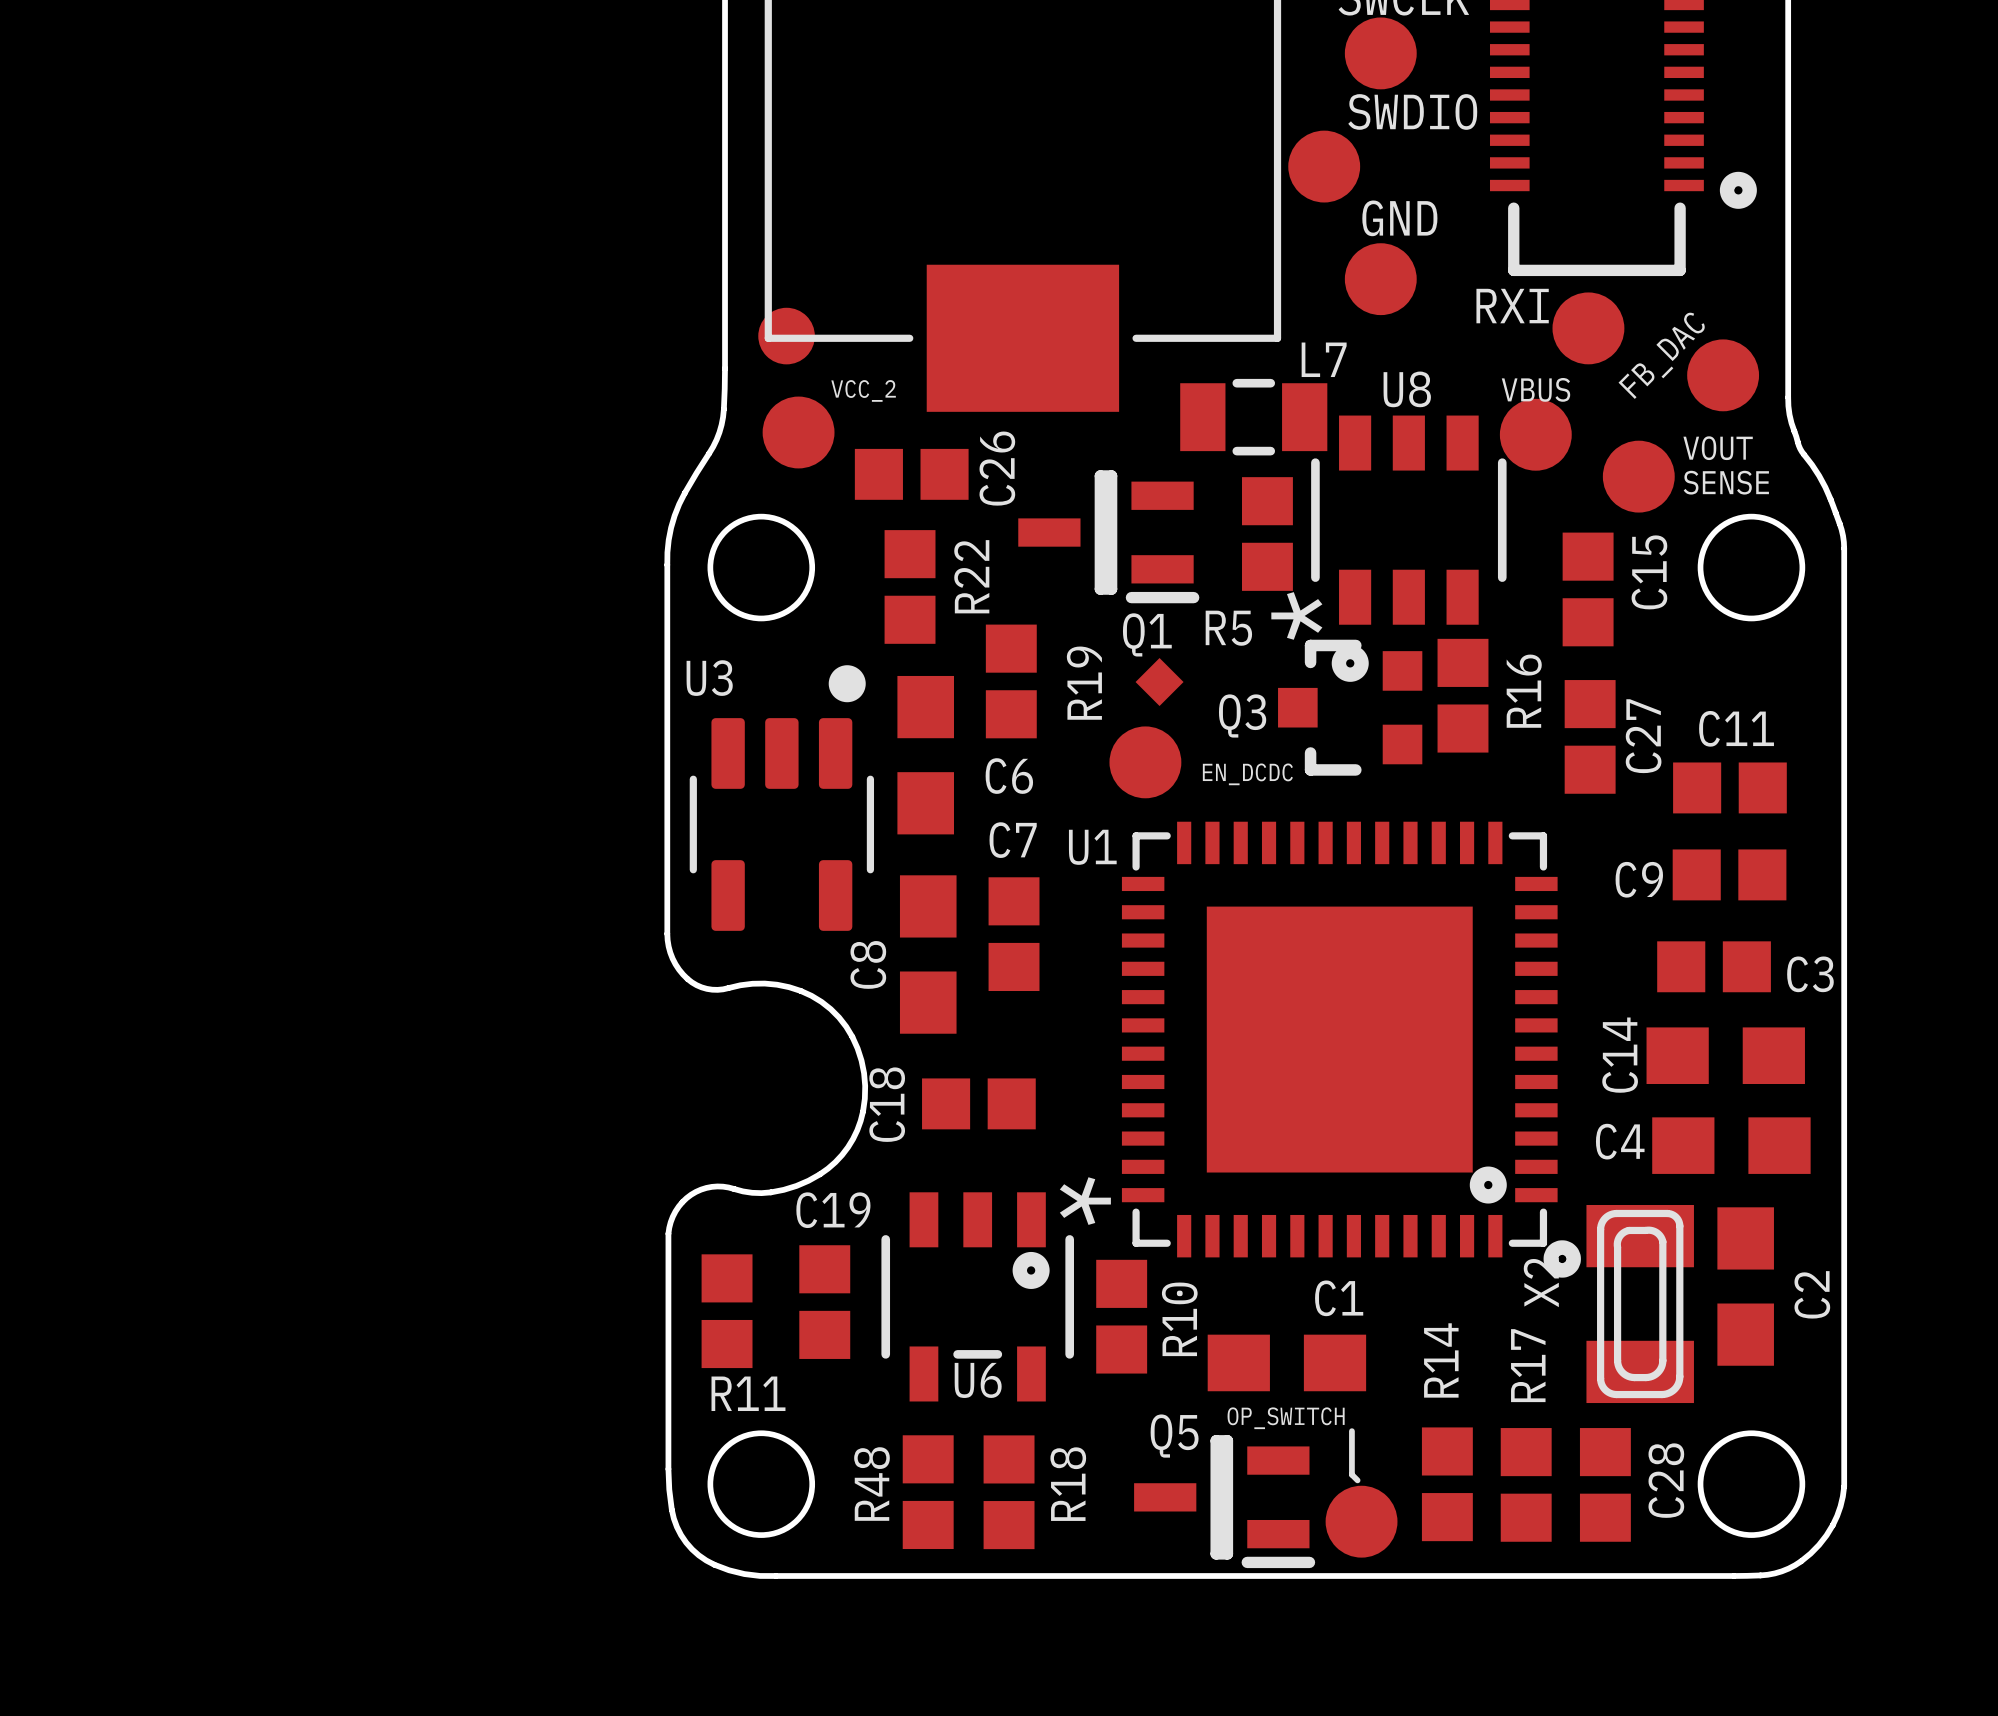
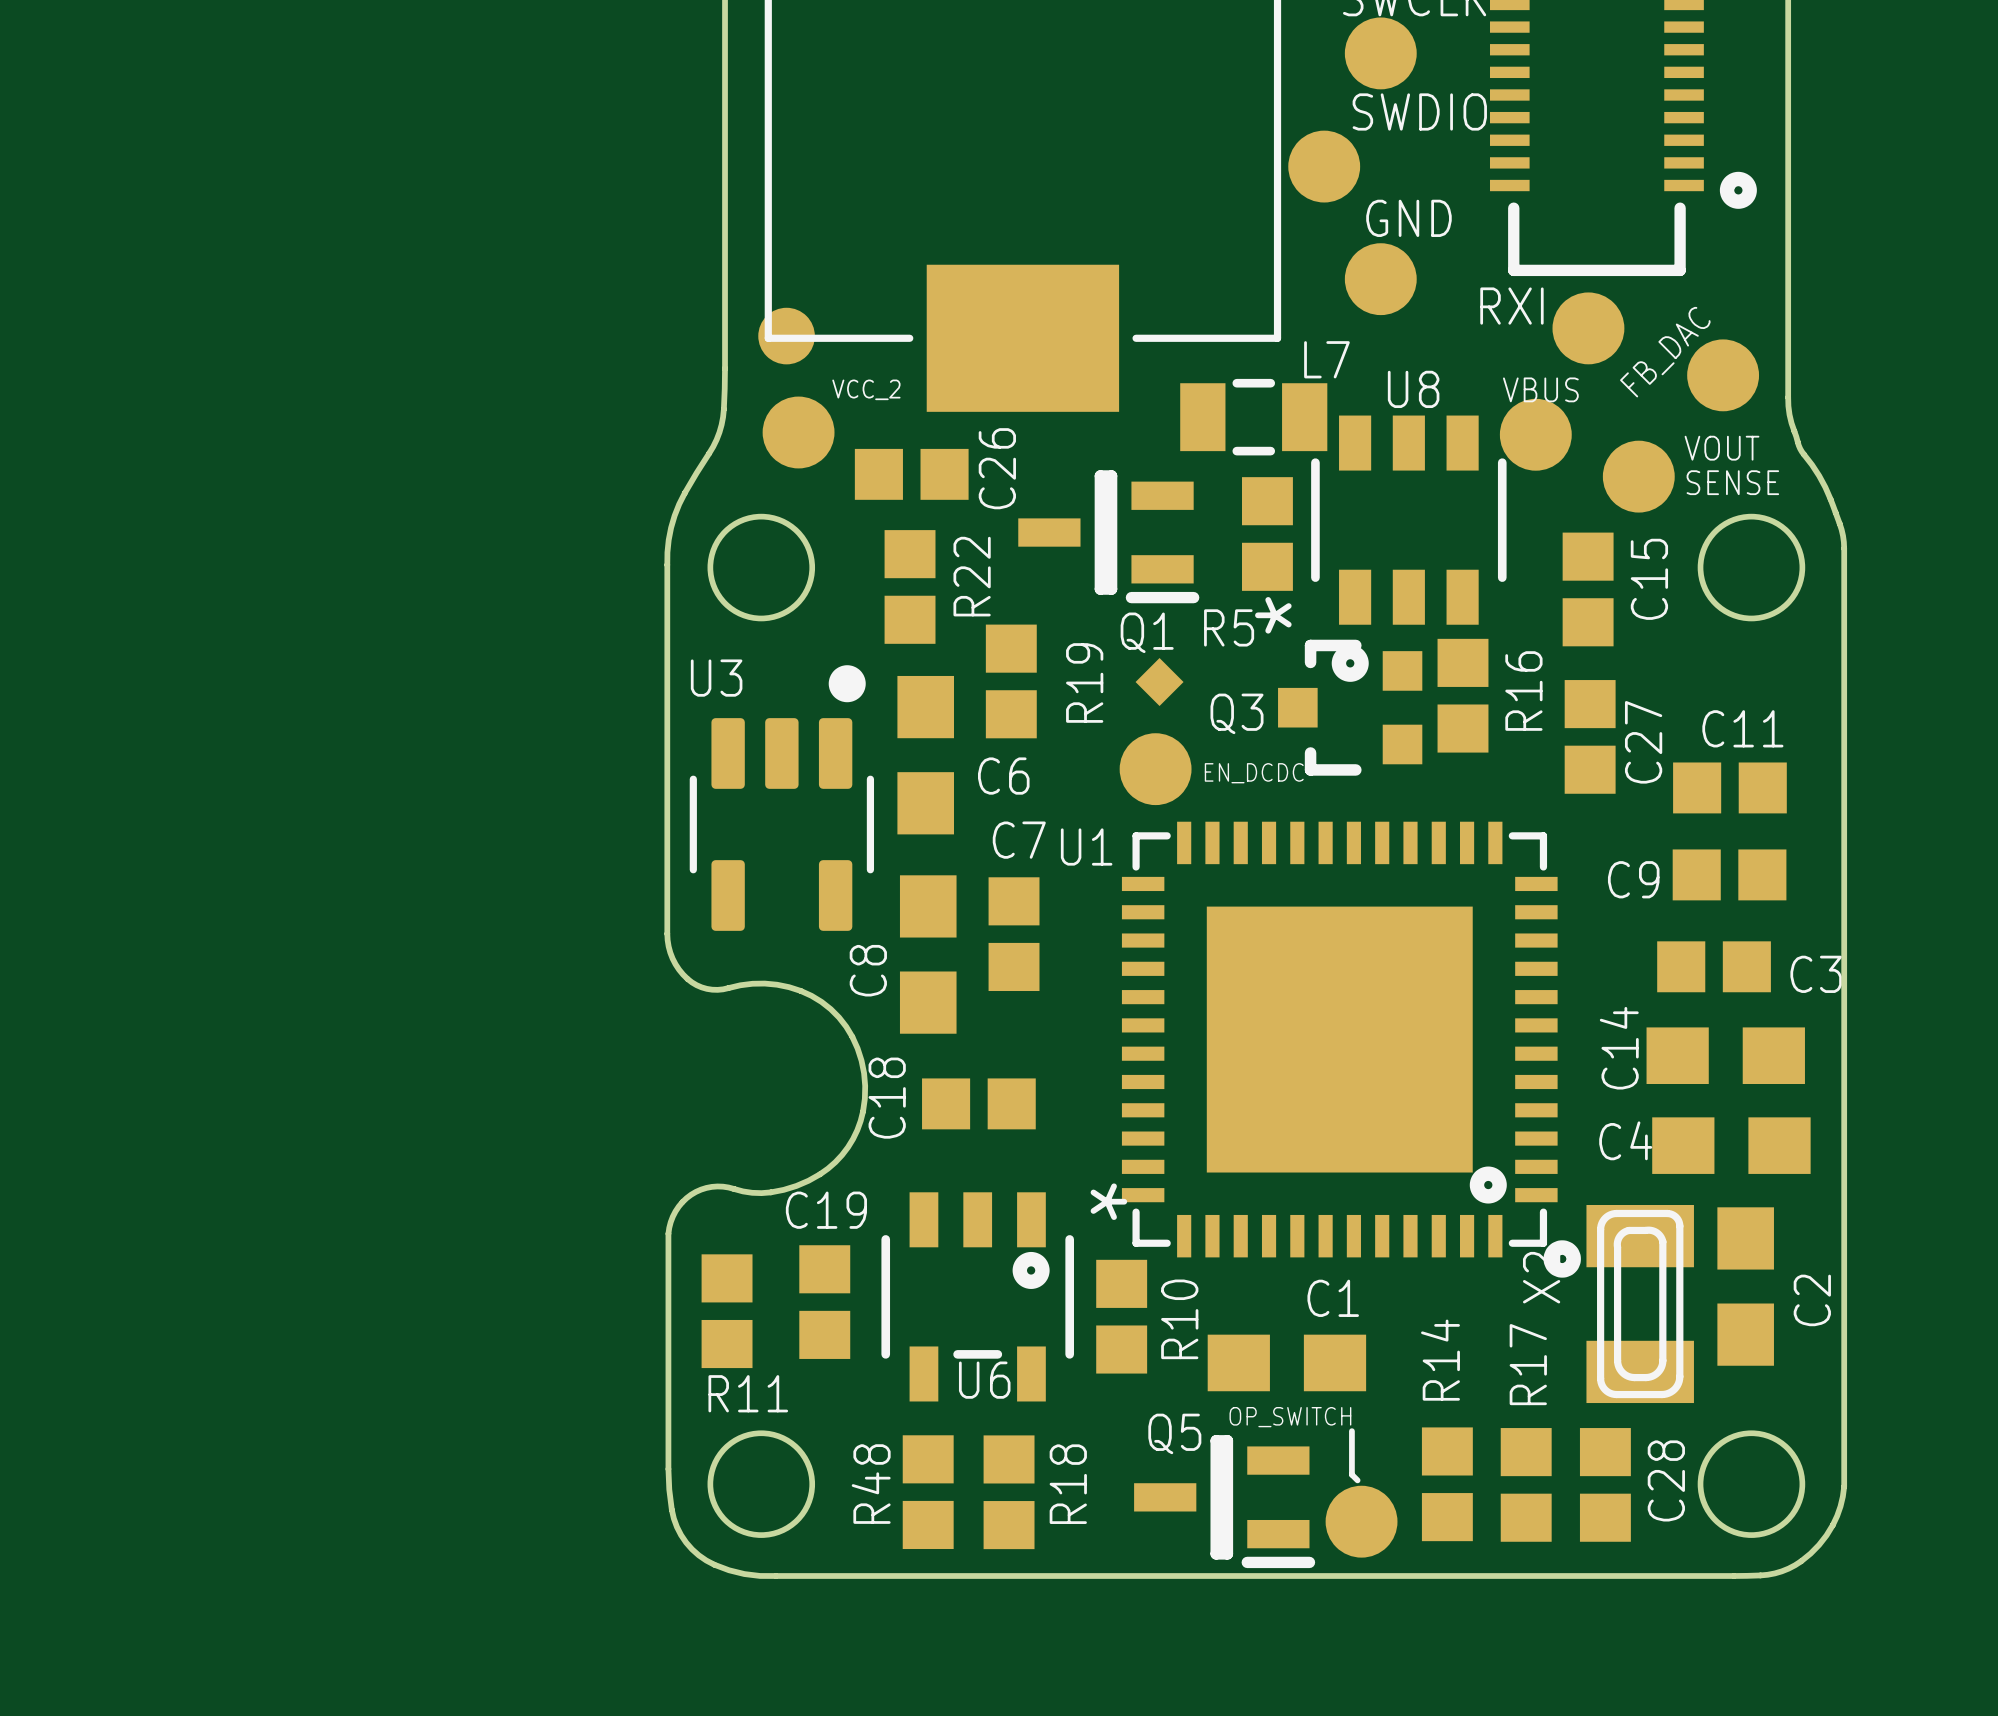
part position: (1145, 762) -> (1155, 769)

